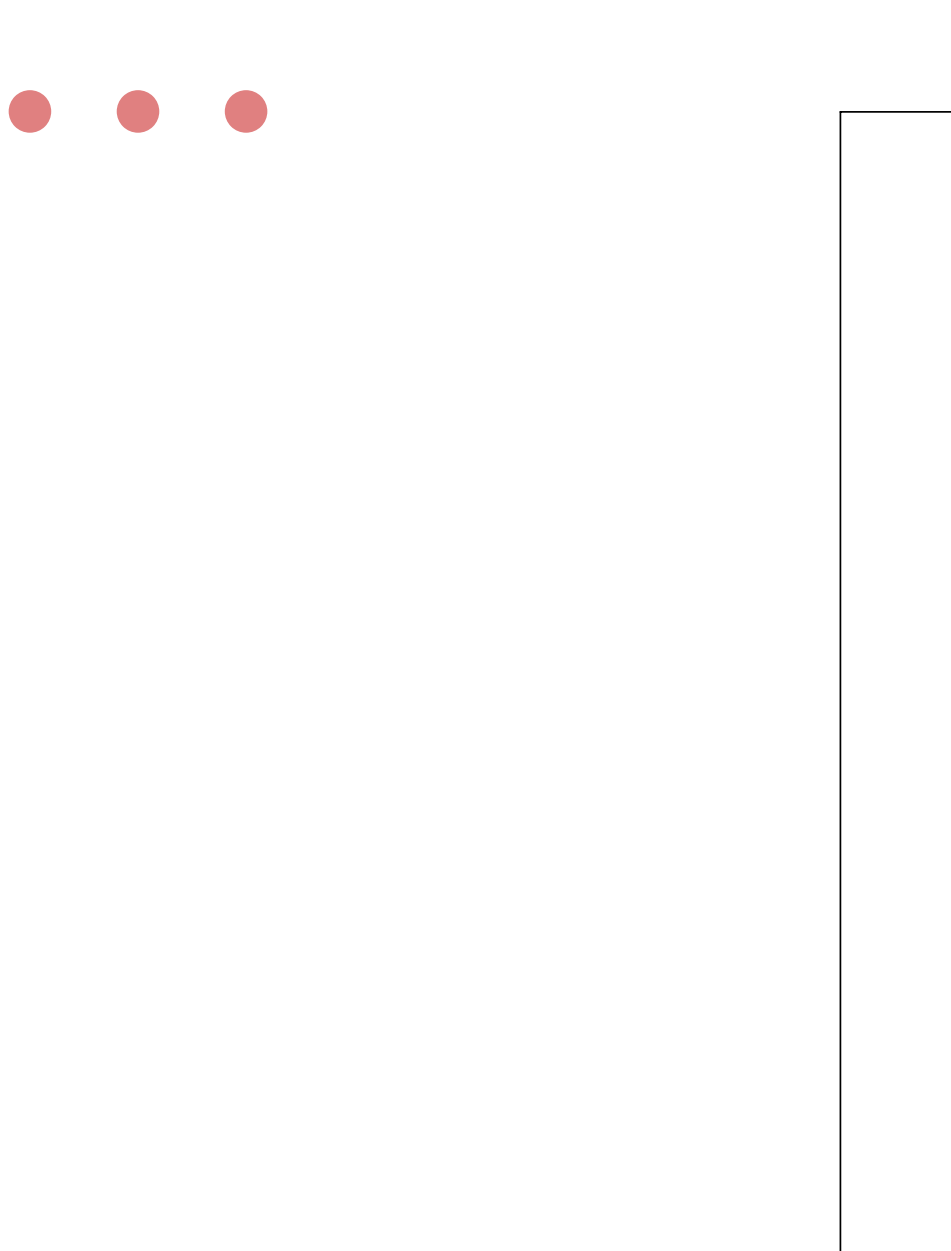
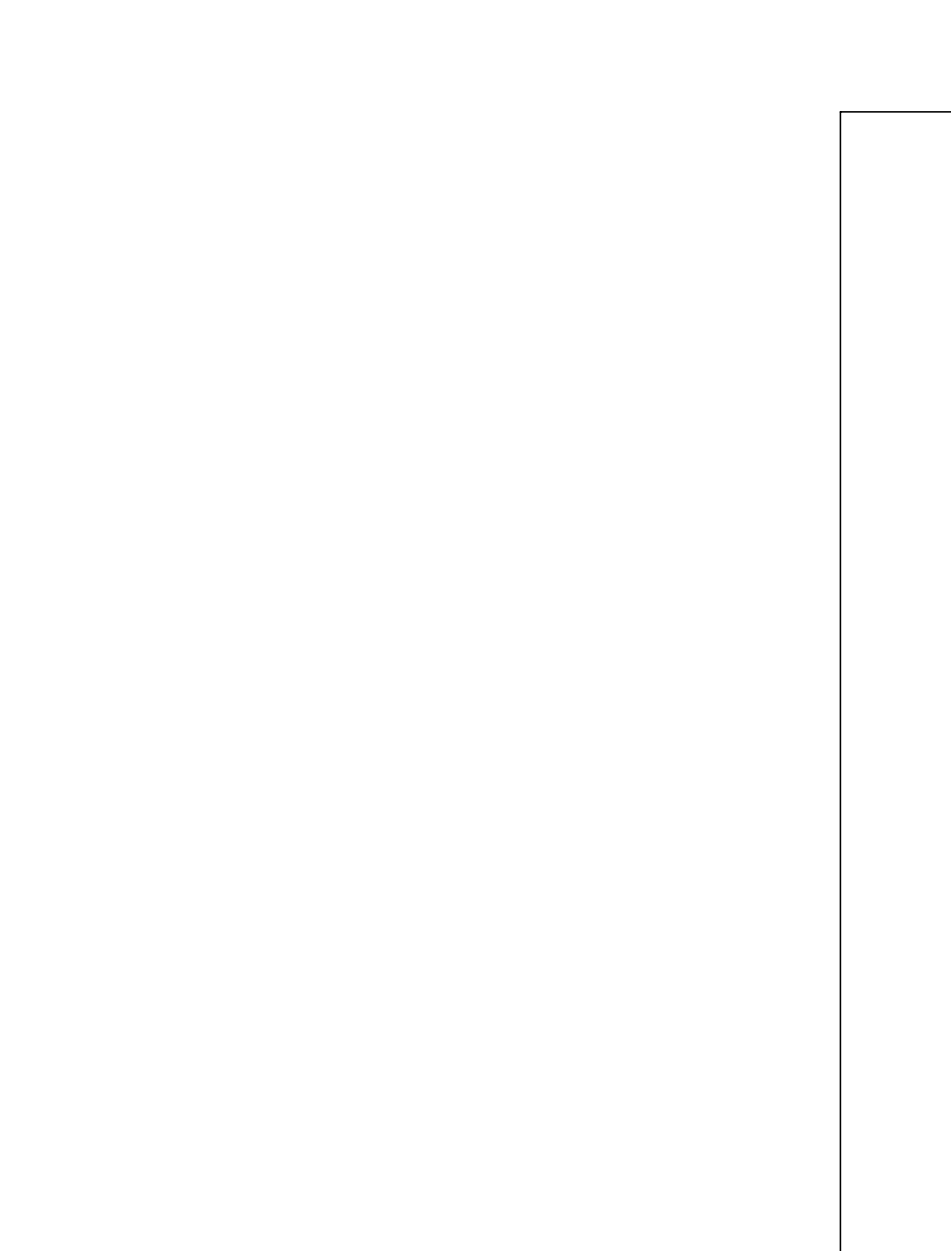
part: (29, 111) -> none
part: (138, 111) -> none
part: (246, 111) -> none

